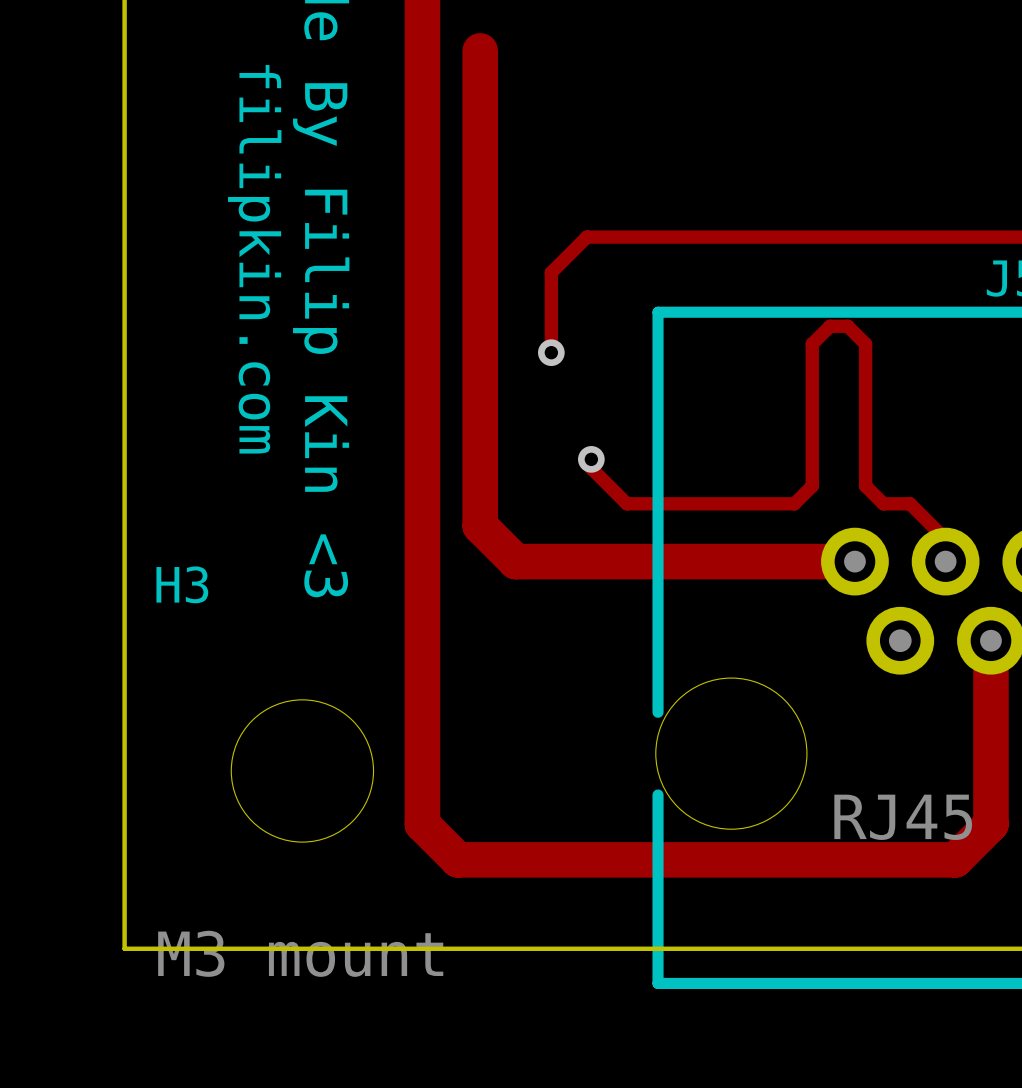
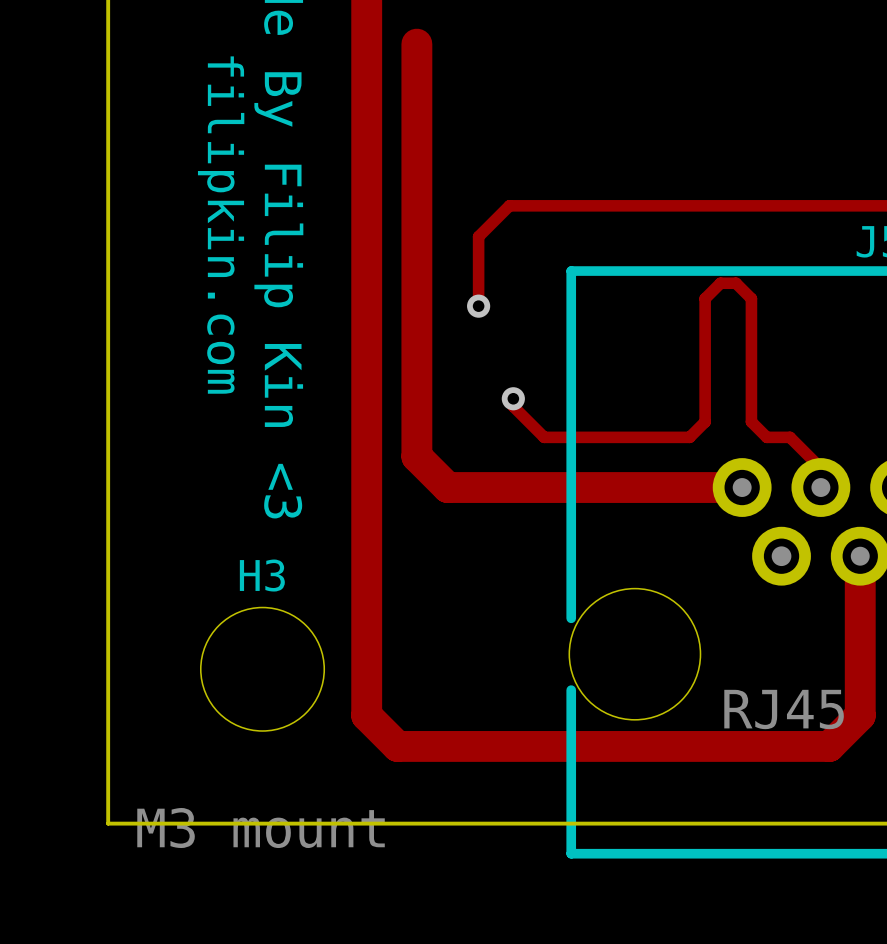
H3 name position: H3 (182, 584) -> H3 (262, 575)

